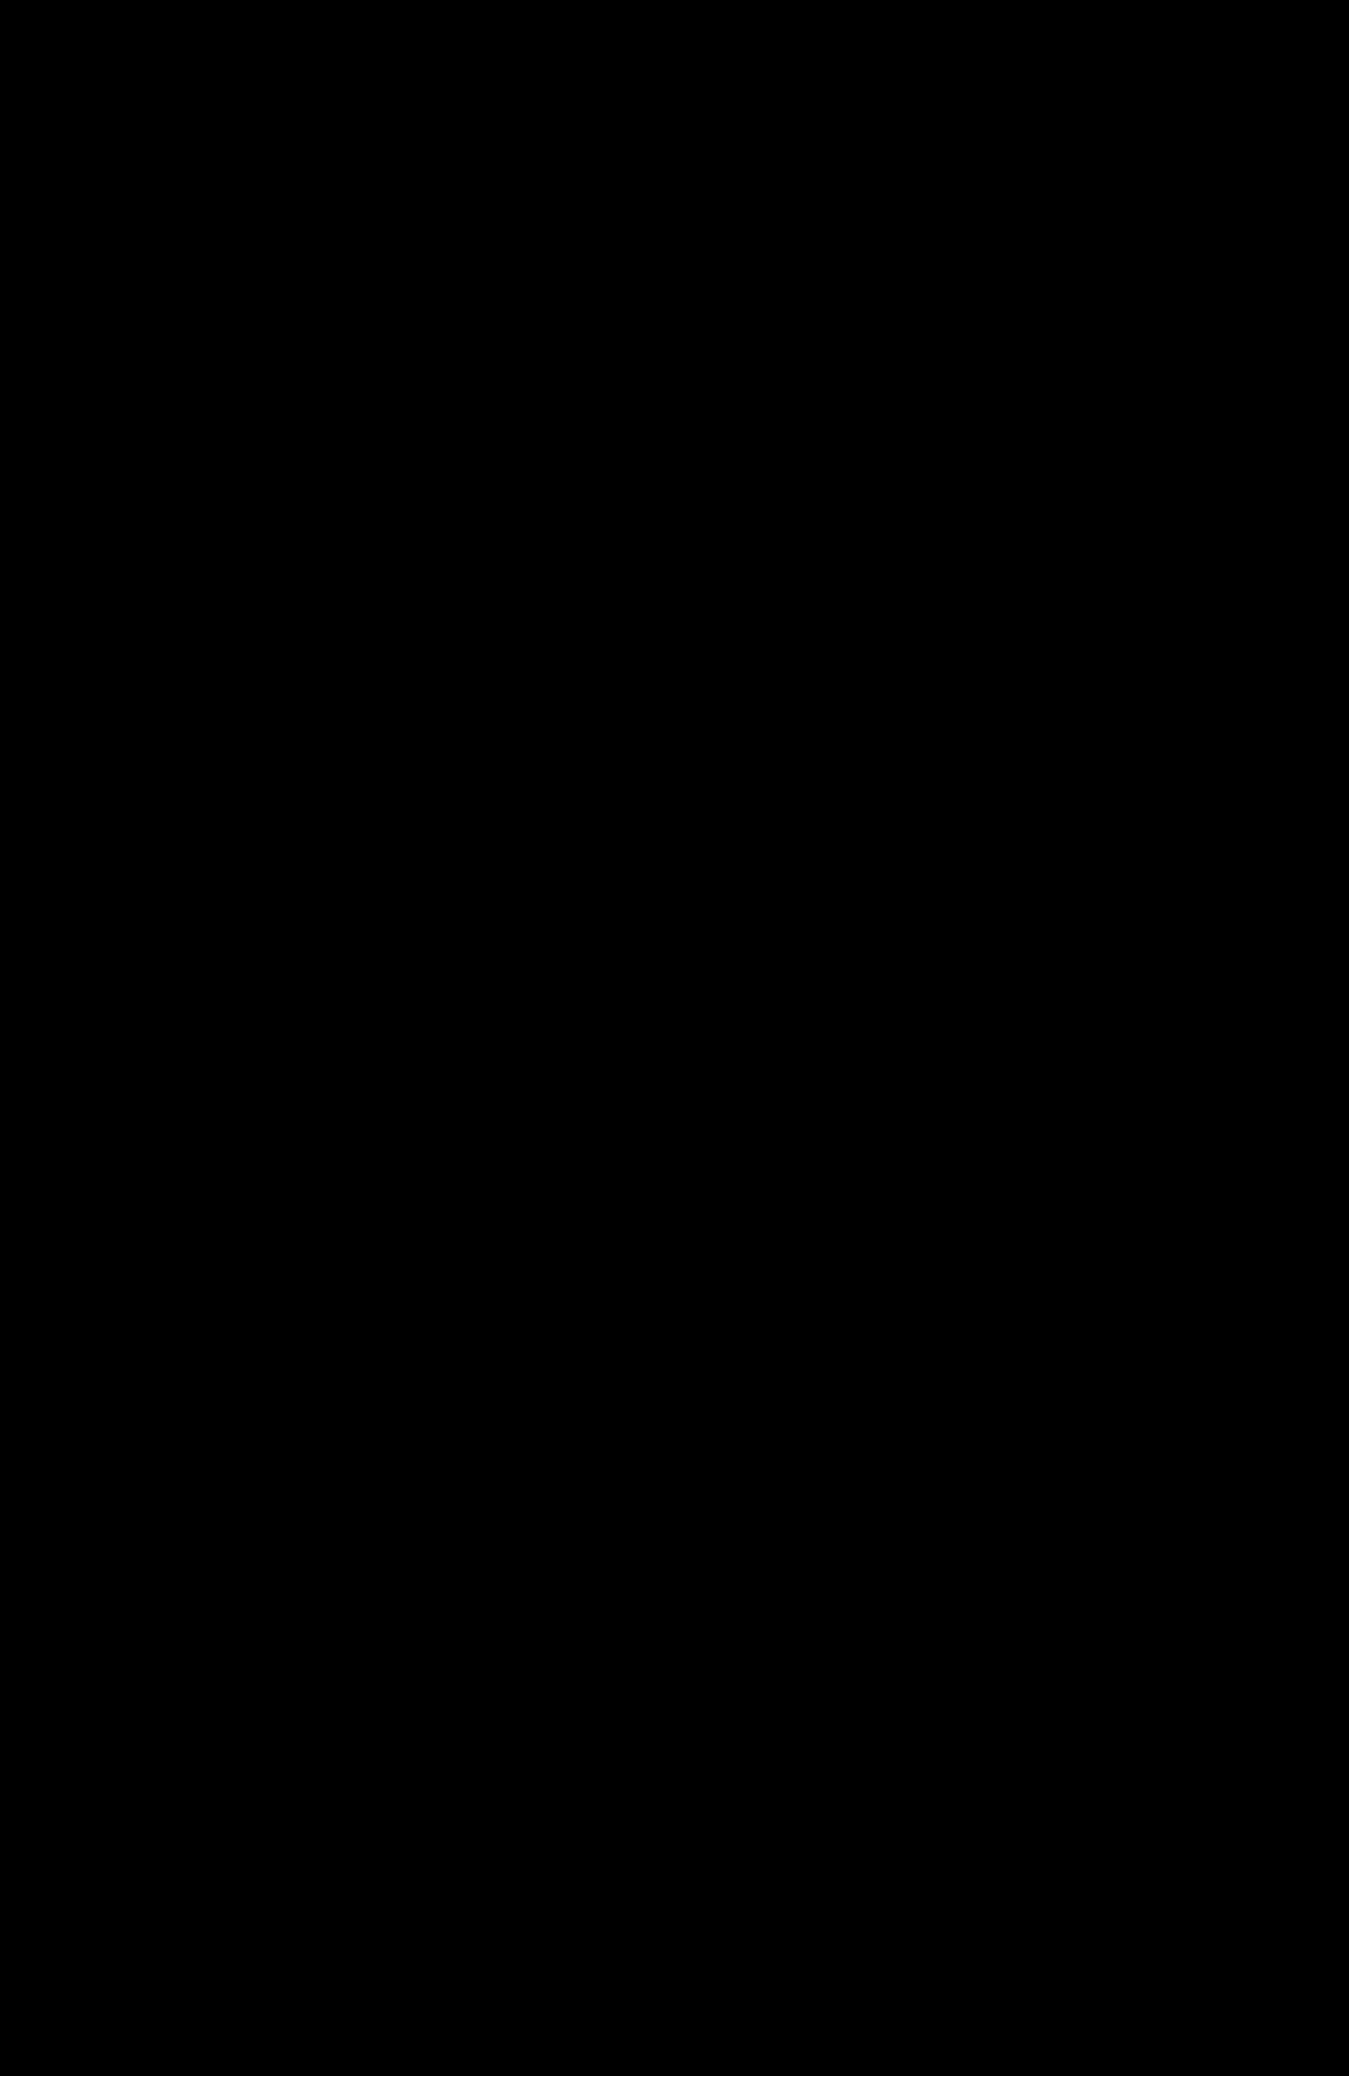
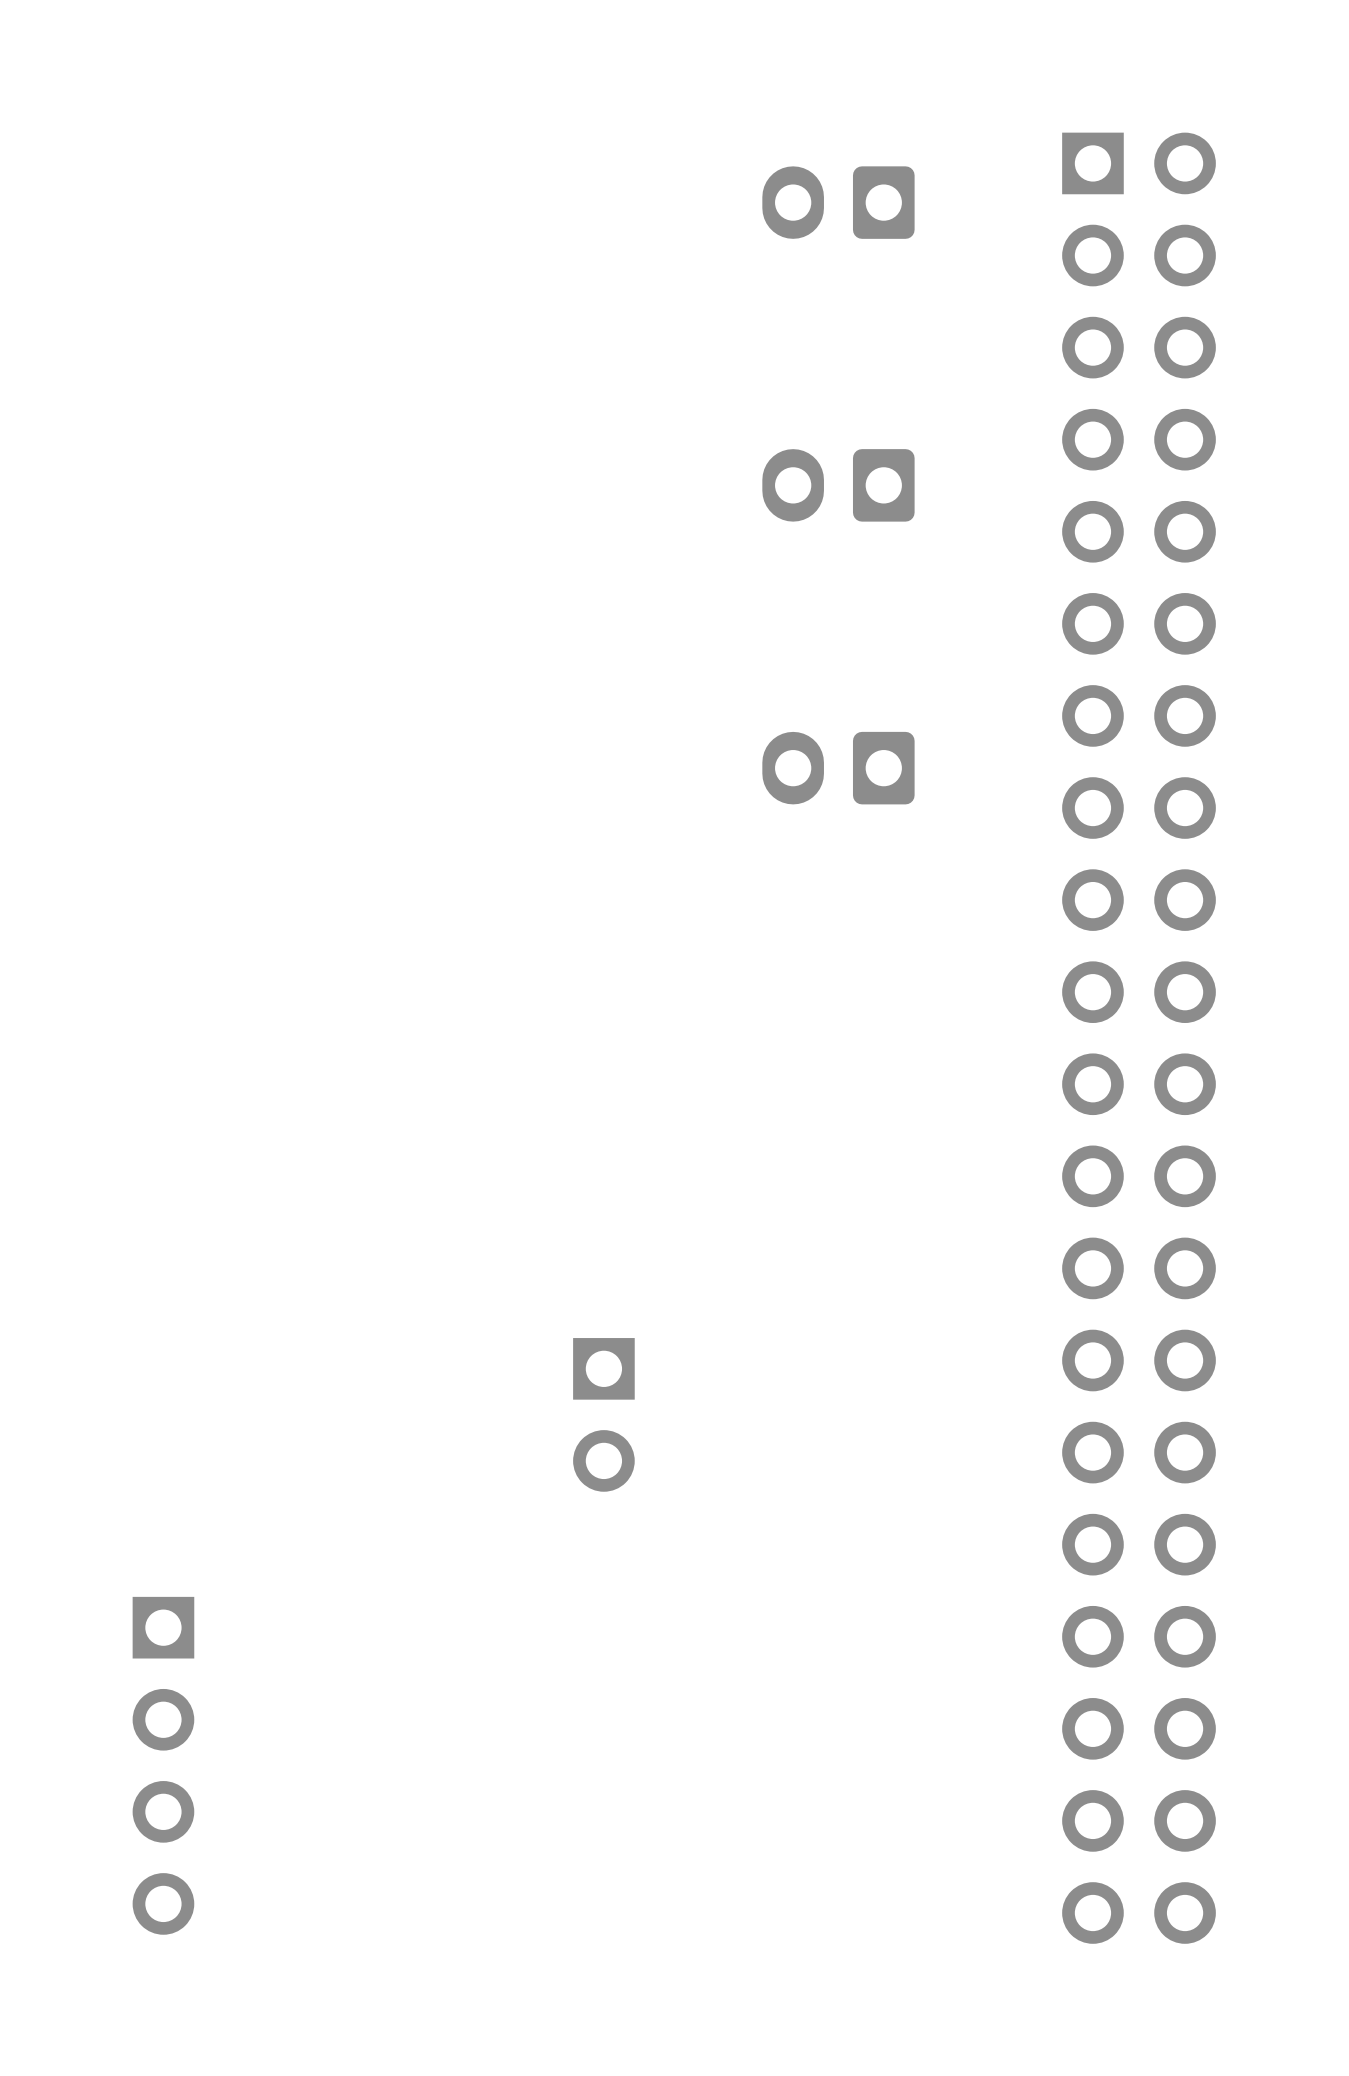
part: none -> (838, 202)
part: none -> (838, 485)
part: none -> (838, 768)
part: none -> (1139, 1038)
part: none -> (603, 1414)
part: none -> (163, 1765)

